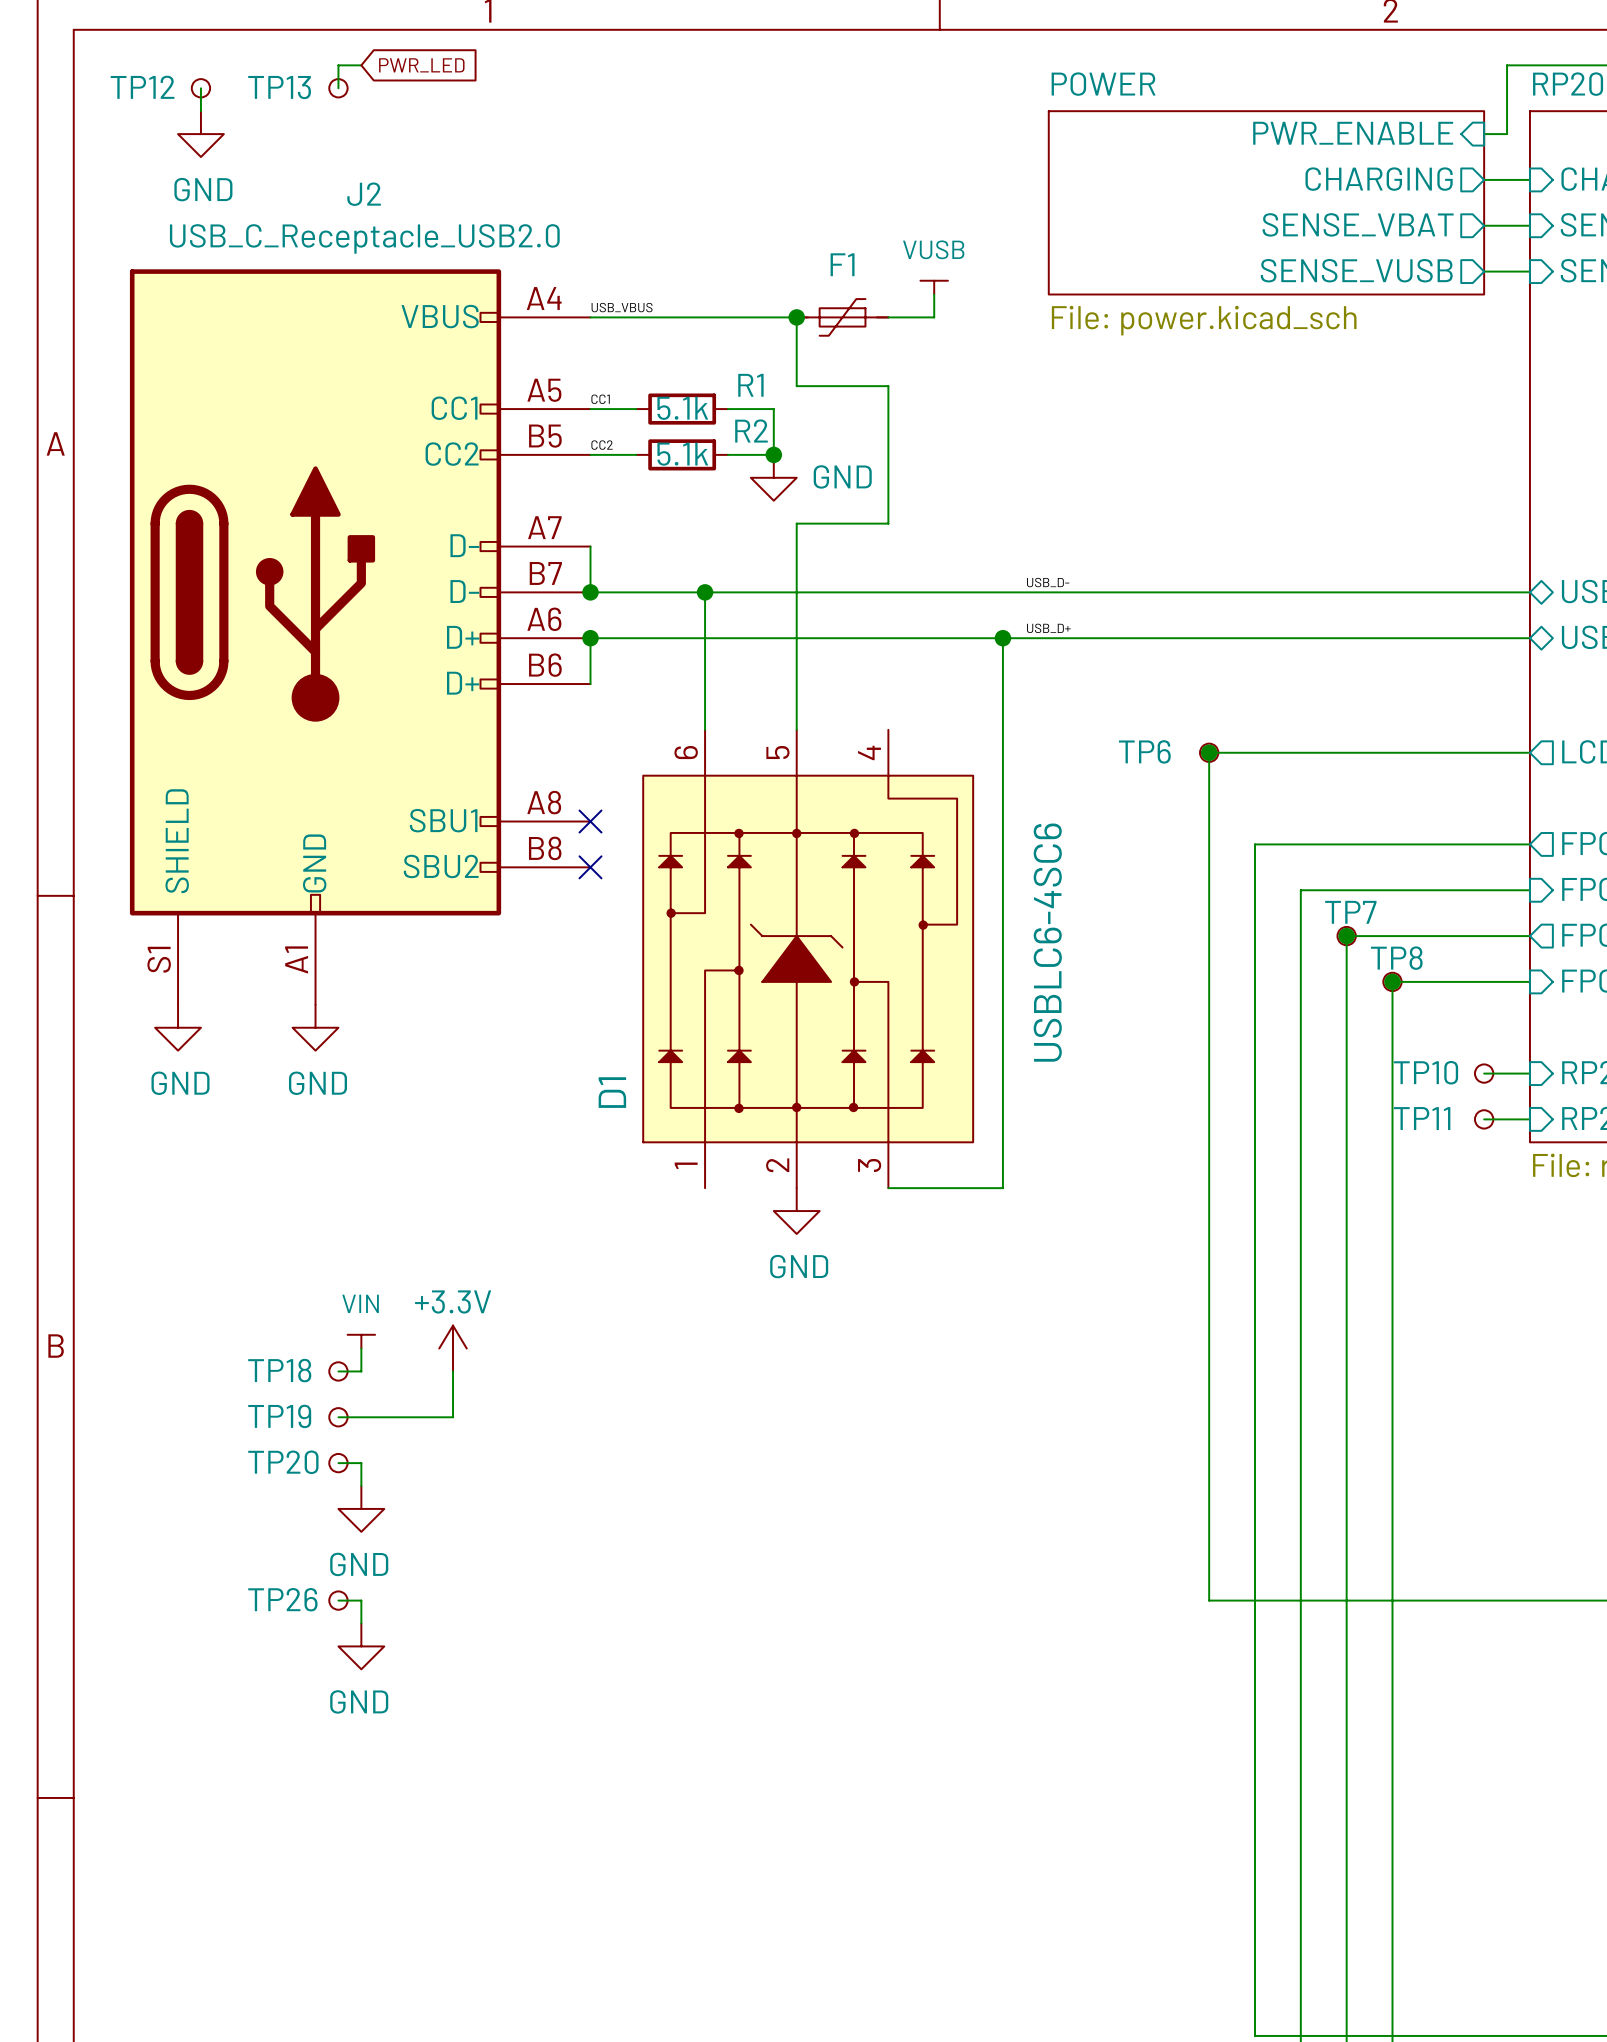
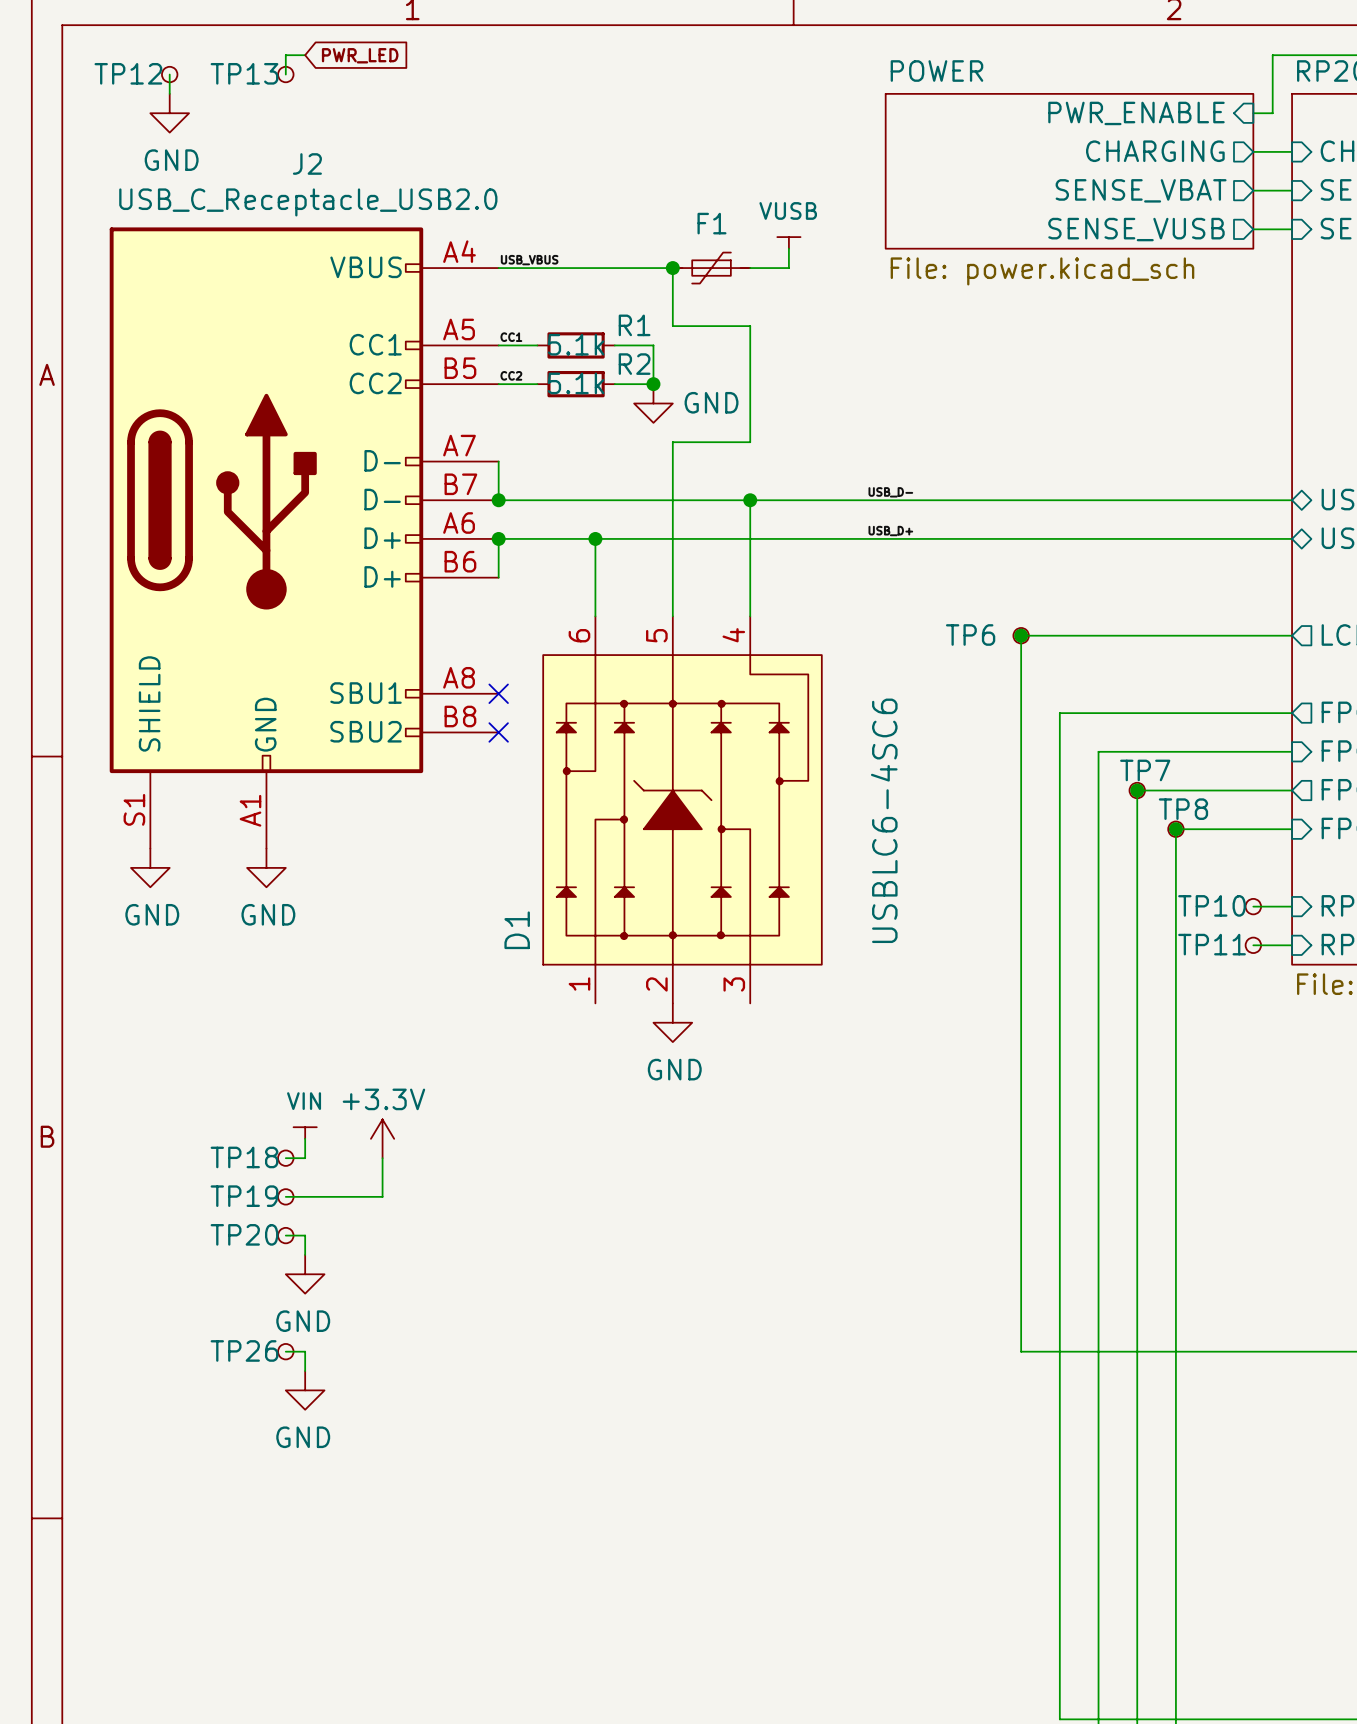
wire: (705, 592) (705, 638) -> none
junction position: (705, 592) -> (595, 538)
wire: none -> (750, 500) (750, 616)
junction: none -> (750, 500)
wire: (1002, 638) (1002, 1188) (888, 1188) -> none
junction: (1002, 638) -> none

